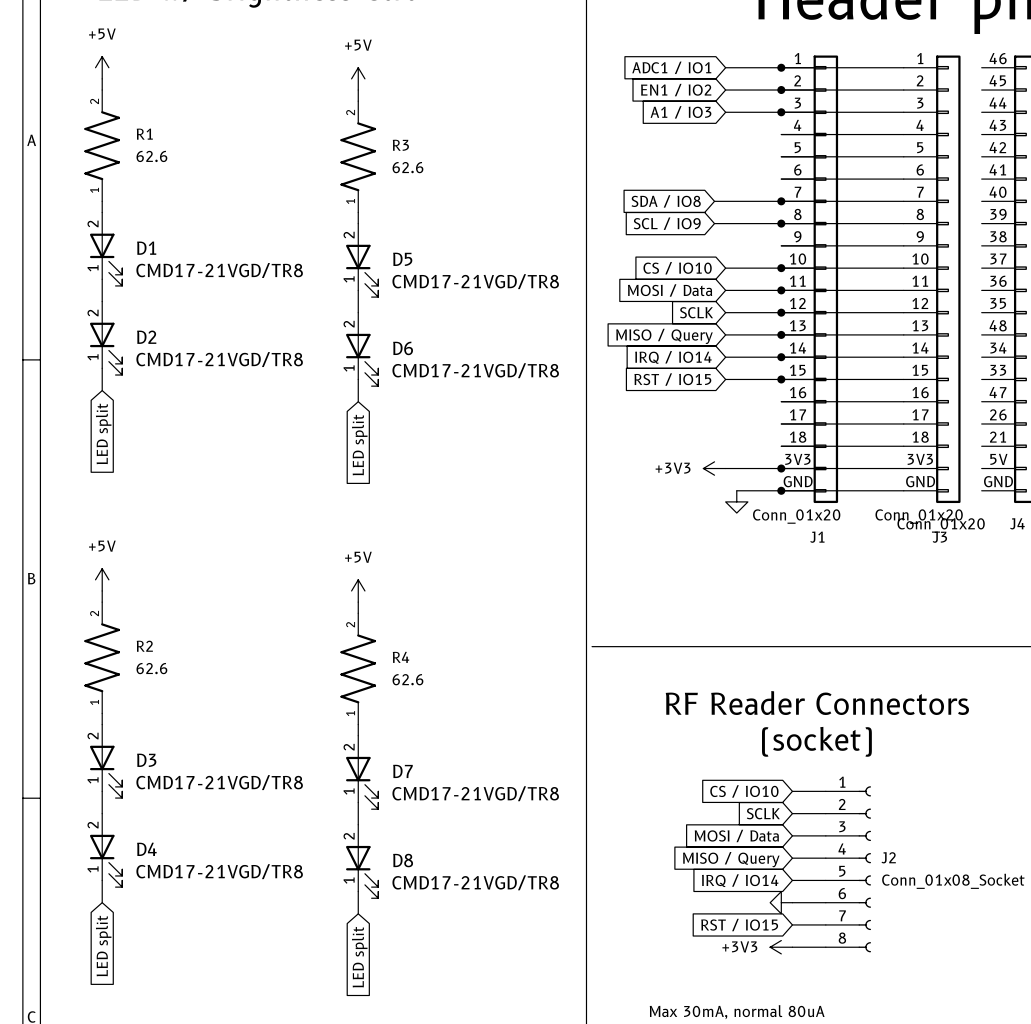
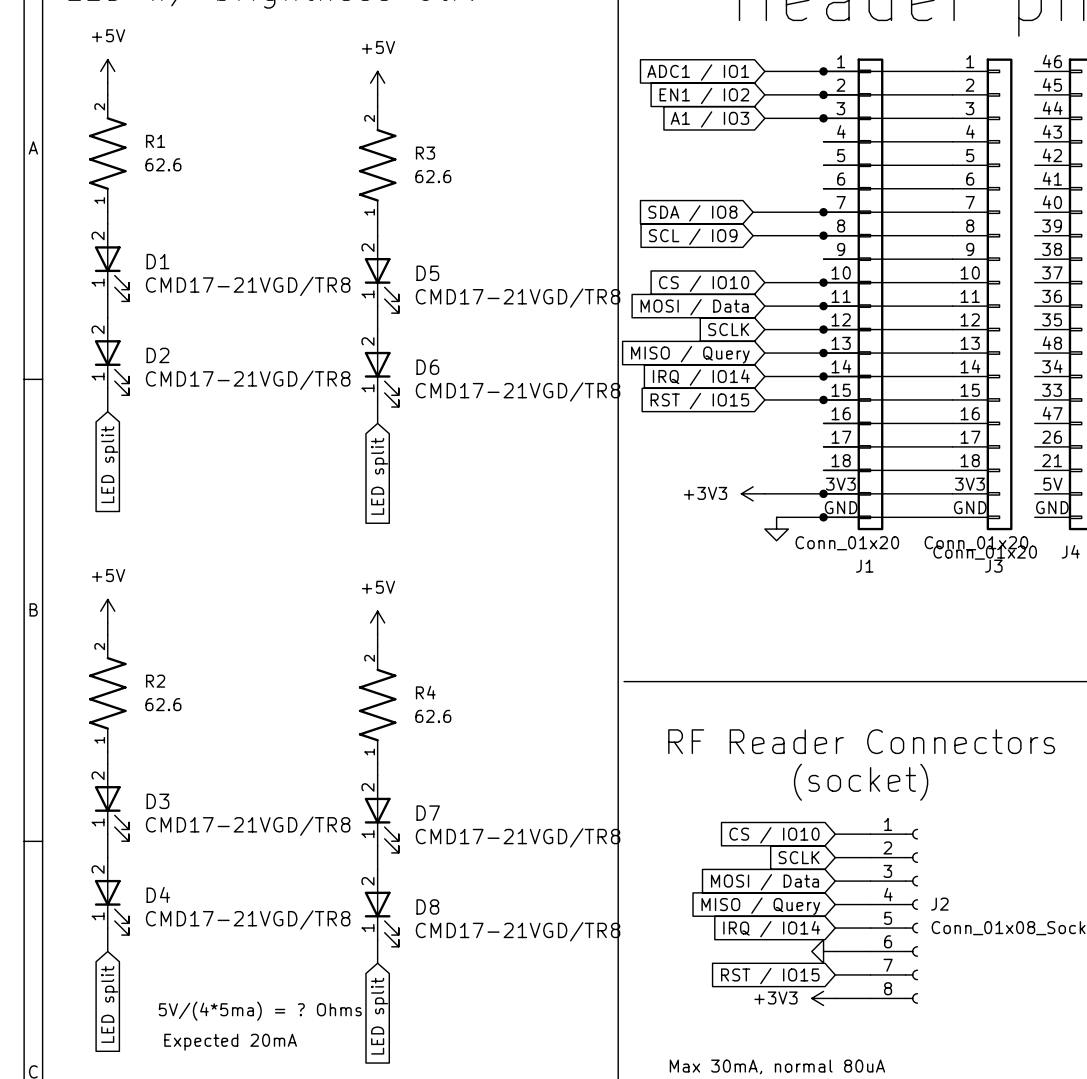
text: none -> 5V/(4*5ma) = ? Ohms (260, 1011)
text: none -> Expected 20mA (230, 1042)

